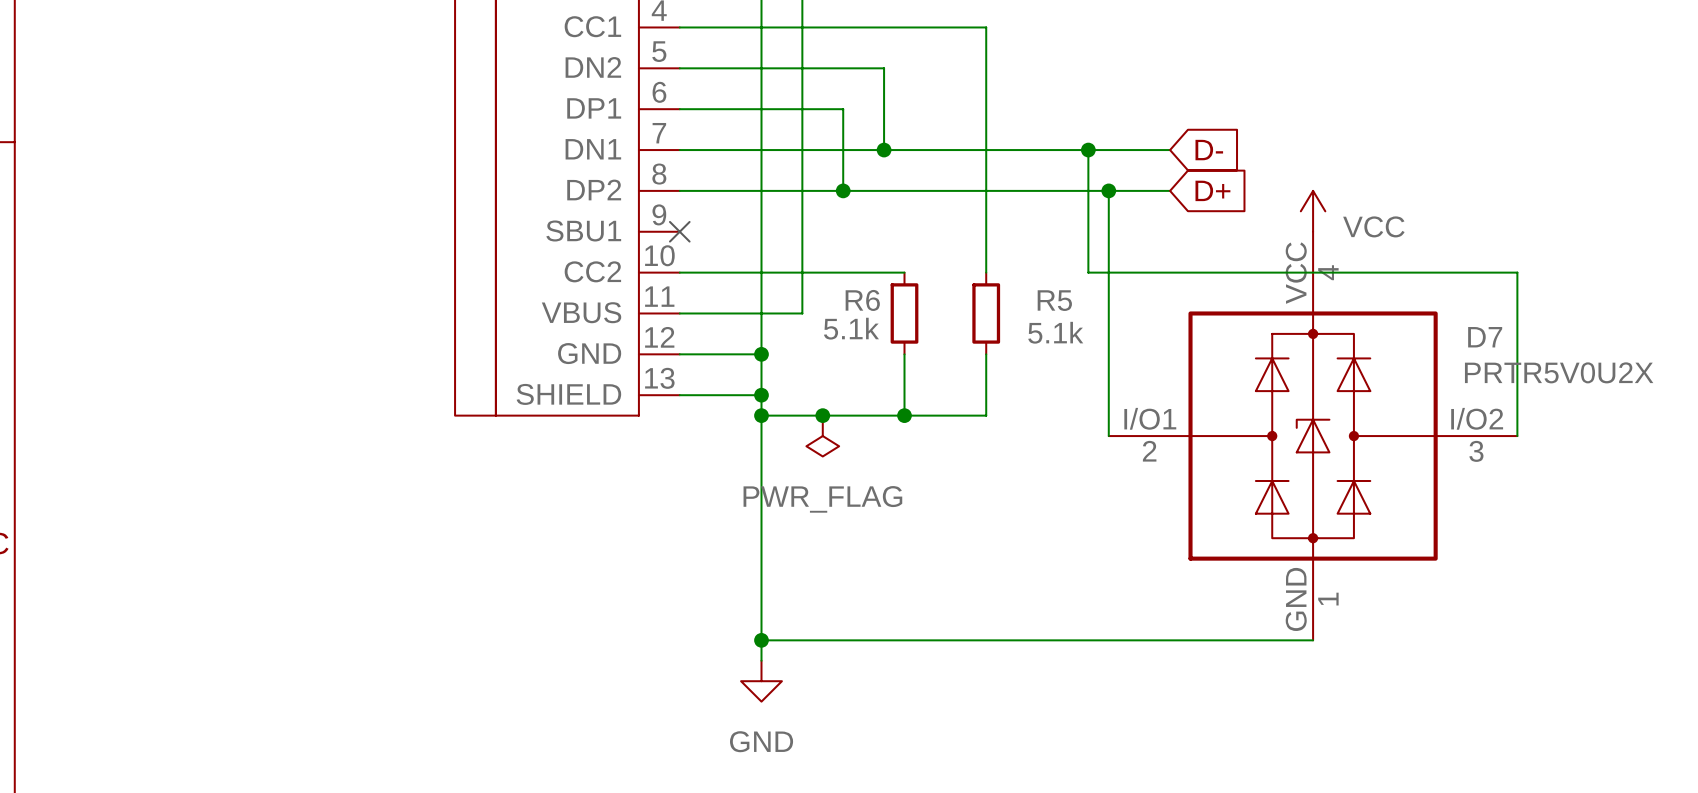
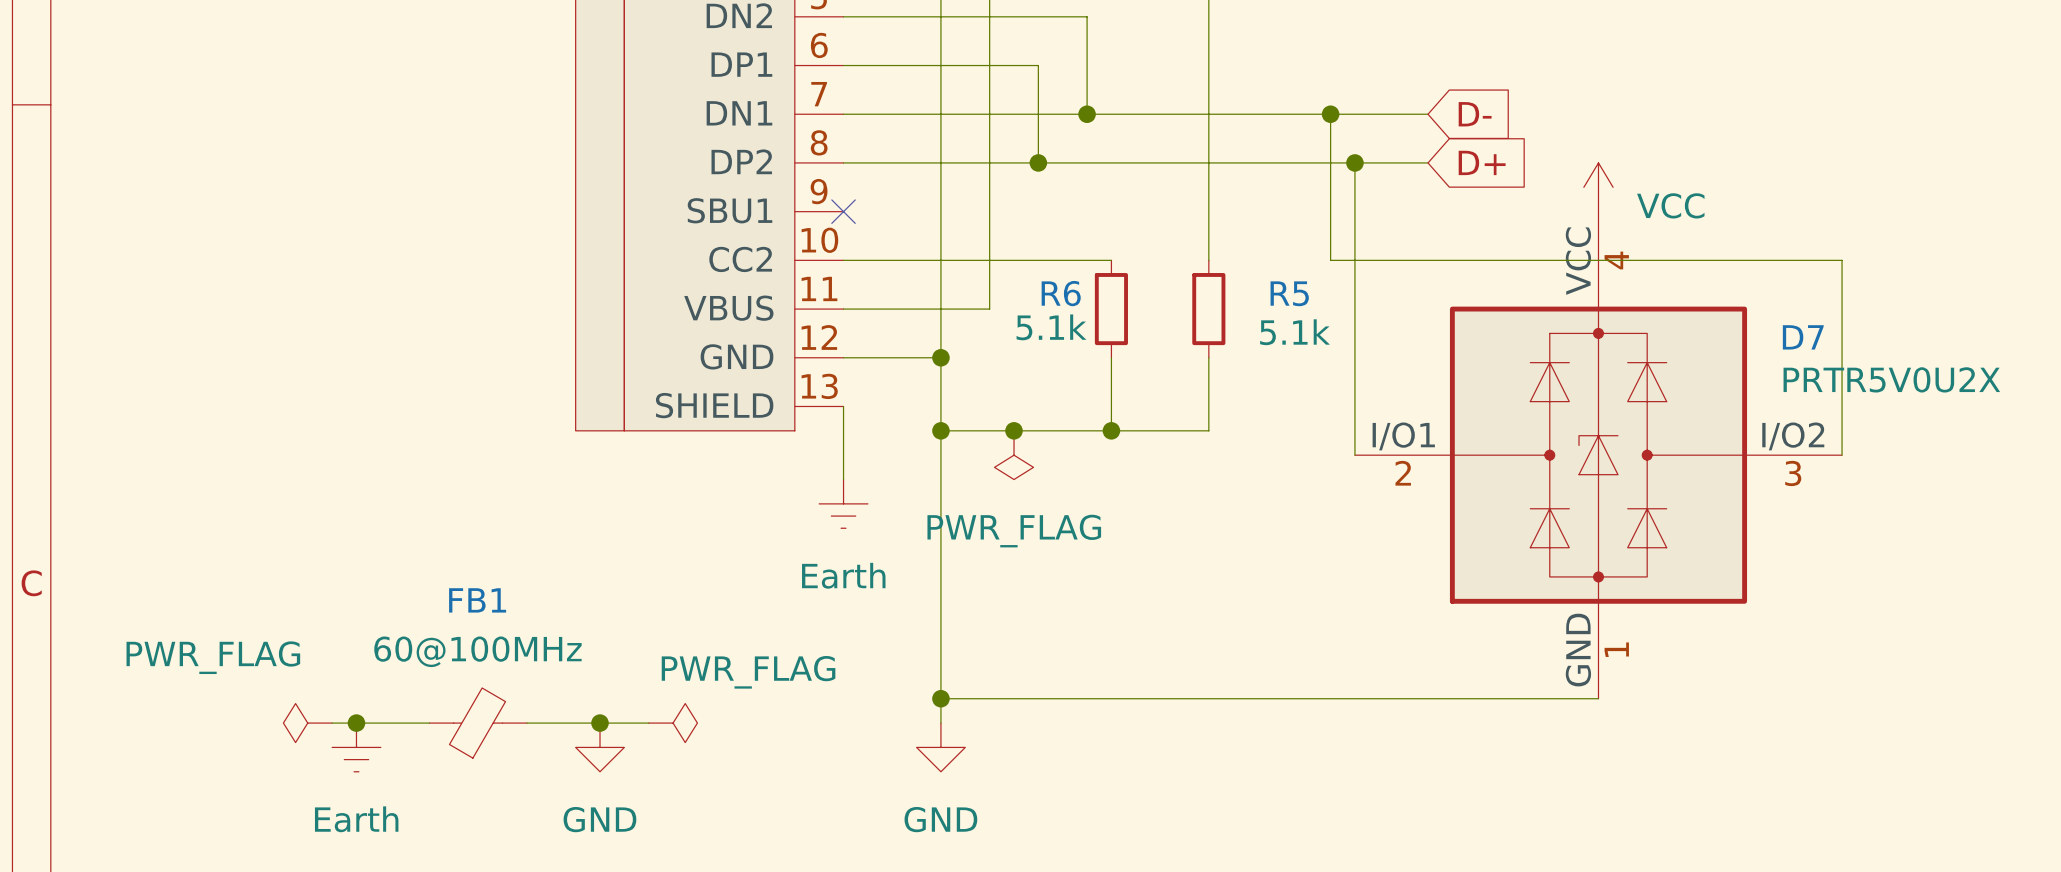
wire: (679, 395) (761, 395) -> (843, 406) (843, 479)
junction: (761, 395) -> none
power symbol: none -> Earth (843, 503)
power symbol: none -> PWR_FLAG (307, 723)
wire: none -> (332, 723) (429, 723)
junction: none -> (356, 723)
FB1: none -> 60@100MHz (478, 723)
wire: none -> (526, 723) (648, 723)
junction: none -> (600, 723)
power symbol: none -> PWR_FLAG (673, 723)
power symbol: none -> Earth (356, 747)
power symbol: none -> GND (600, 747)

